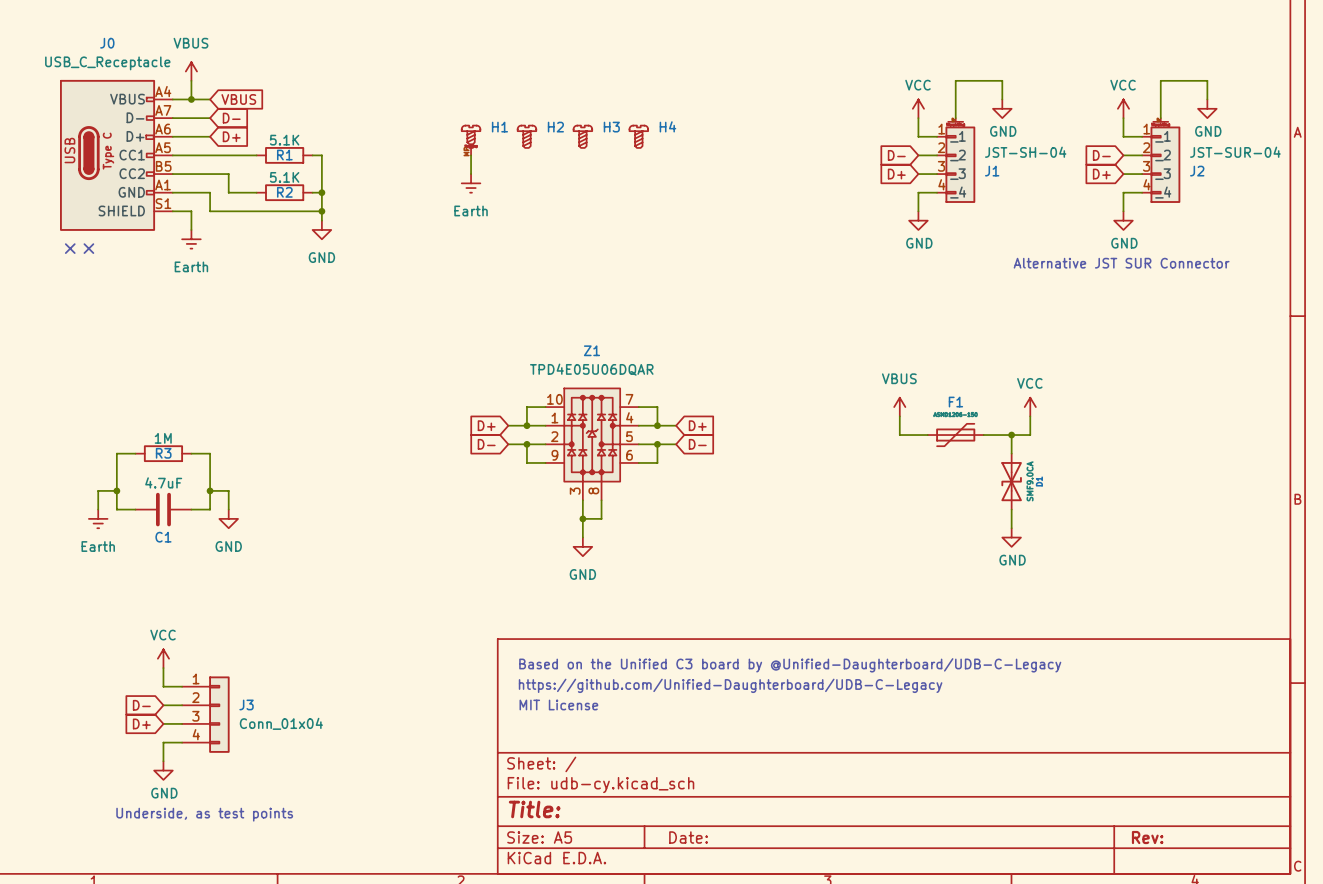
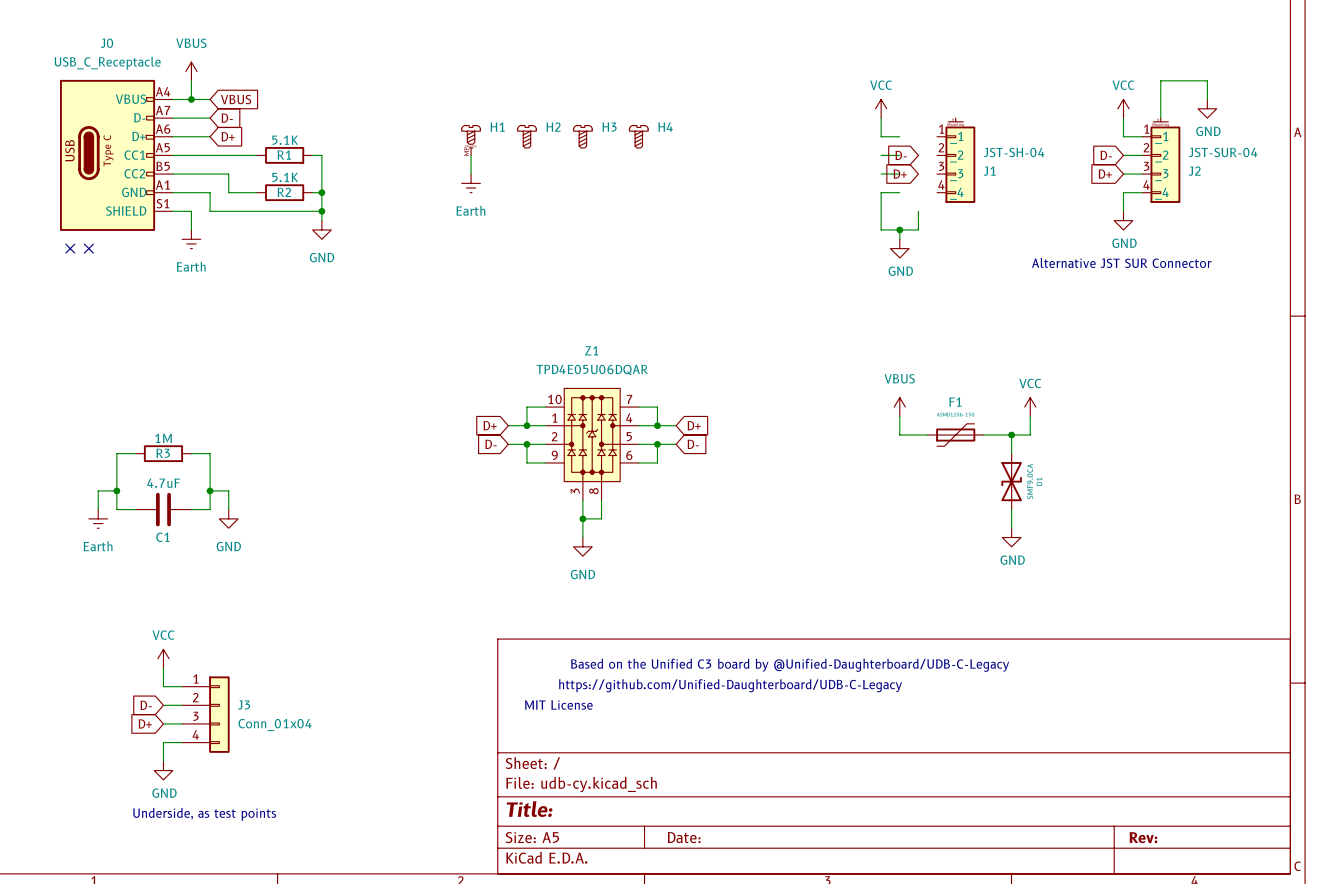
wire: (1002, 99) (1002, 80) (955, 80) (955, 118) -> none
power symbol position: VCC (918, 108) -> VCC (881, 108)
power symbol: GND (1002, 108) -> none
wire: (918, 118) (918, 136) (937, 136) -> (881, 118) (881, 136) (899, 136)
wire: (918, 155) (937, 155) -> (881, 155) (899, 155)
wire: (918, 174) (937, 174) -> (881, 174) (899, 174)
wire: (937, 192) (918, 192) (918, 211) -> (899, 192) (881, 192) (881, 229) (918, 229) (918, 211)
power symbol position: GND (918, 220) -> GND (899, 248)
wire: none -> (899, 229) (899, 239)
junction: none -> (899, 229)

